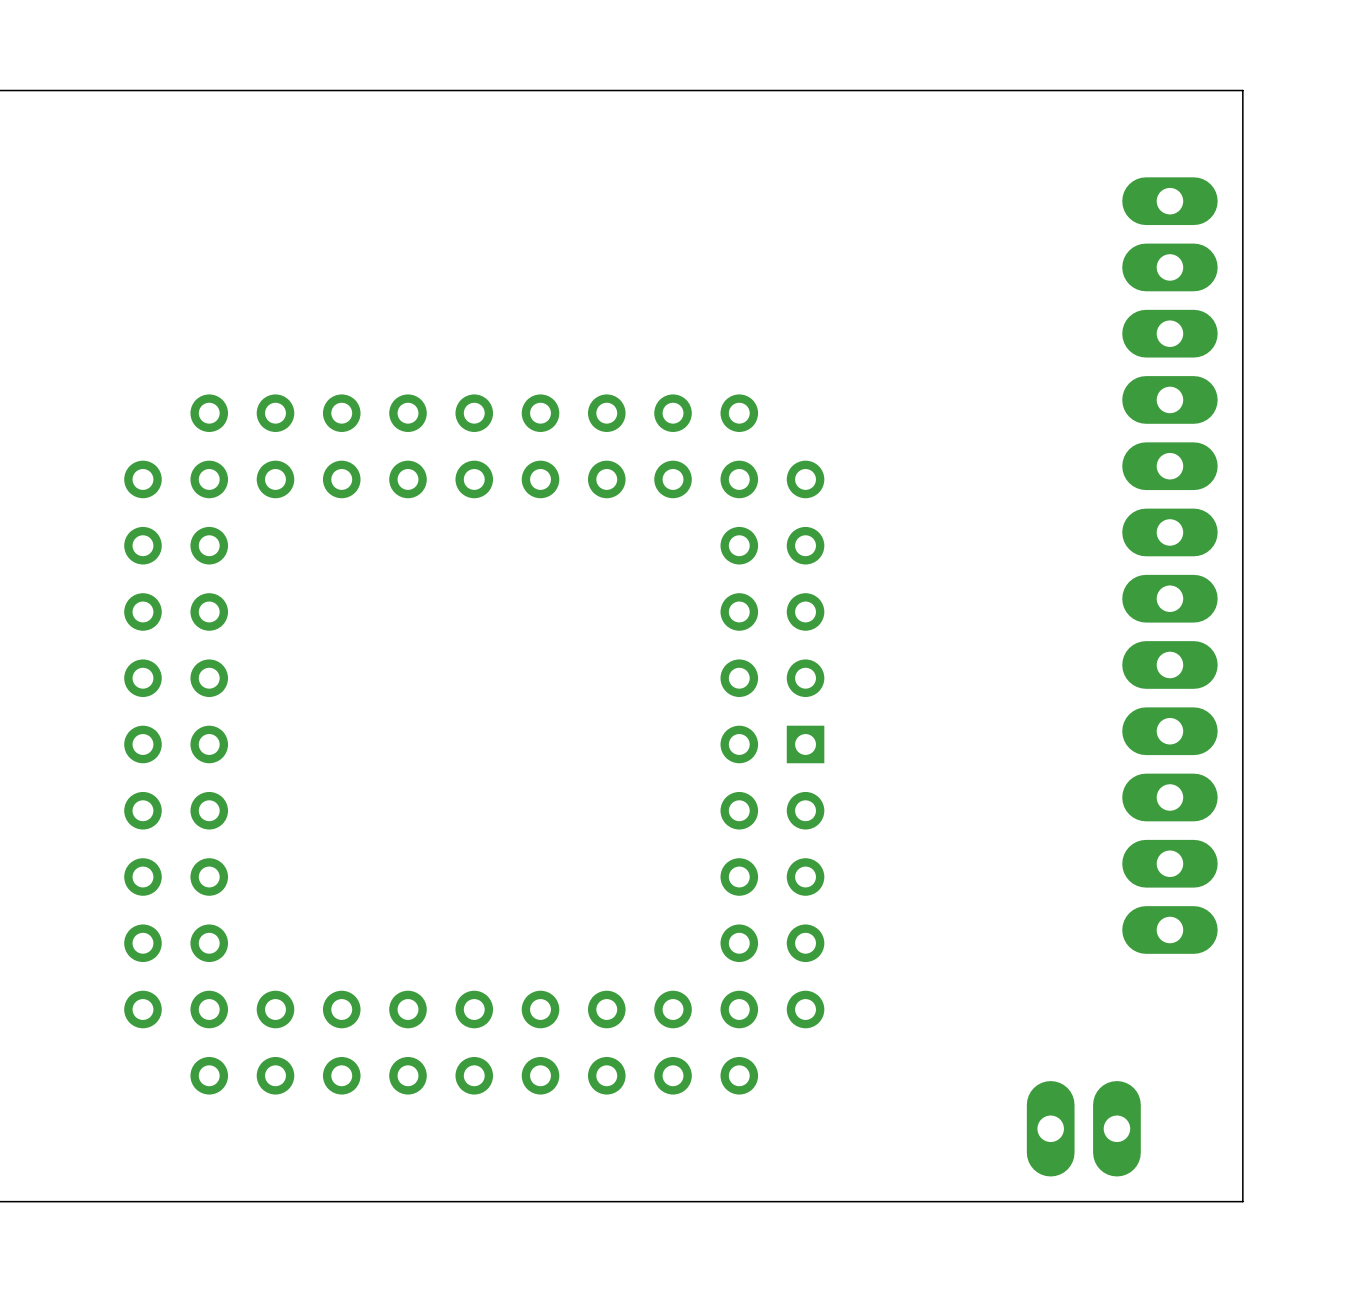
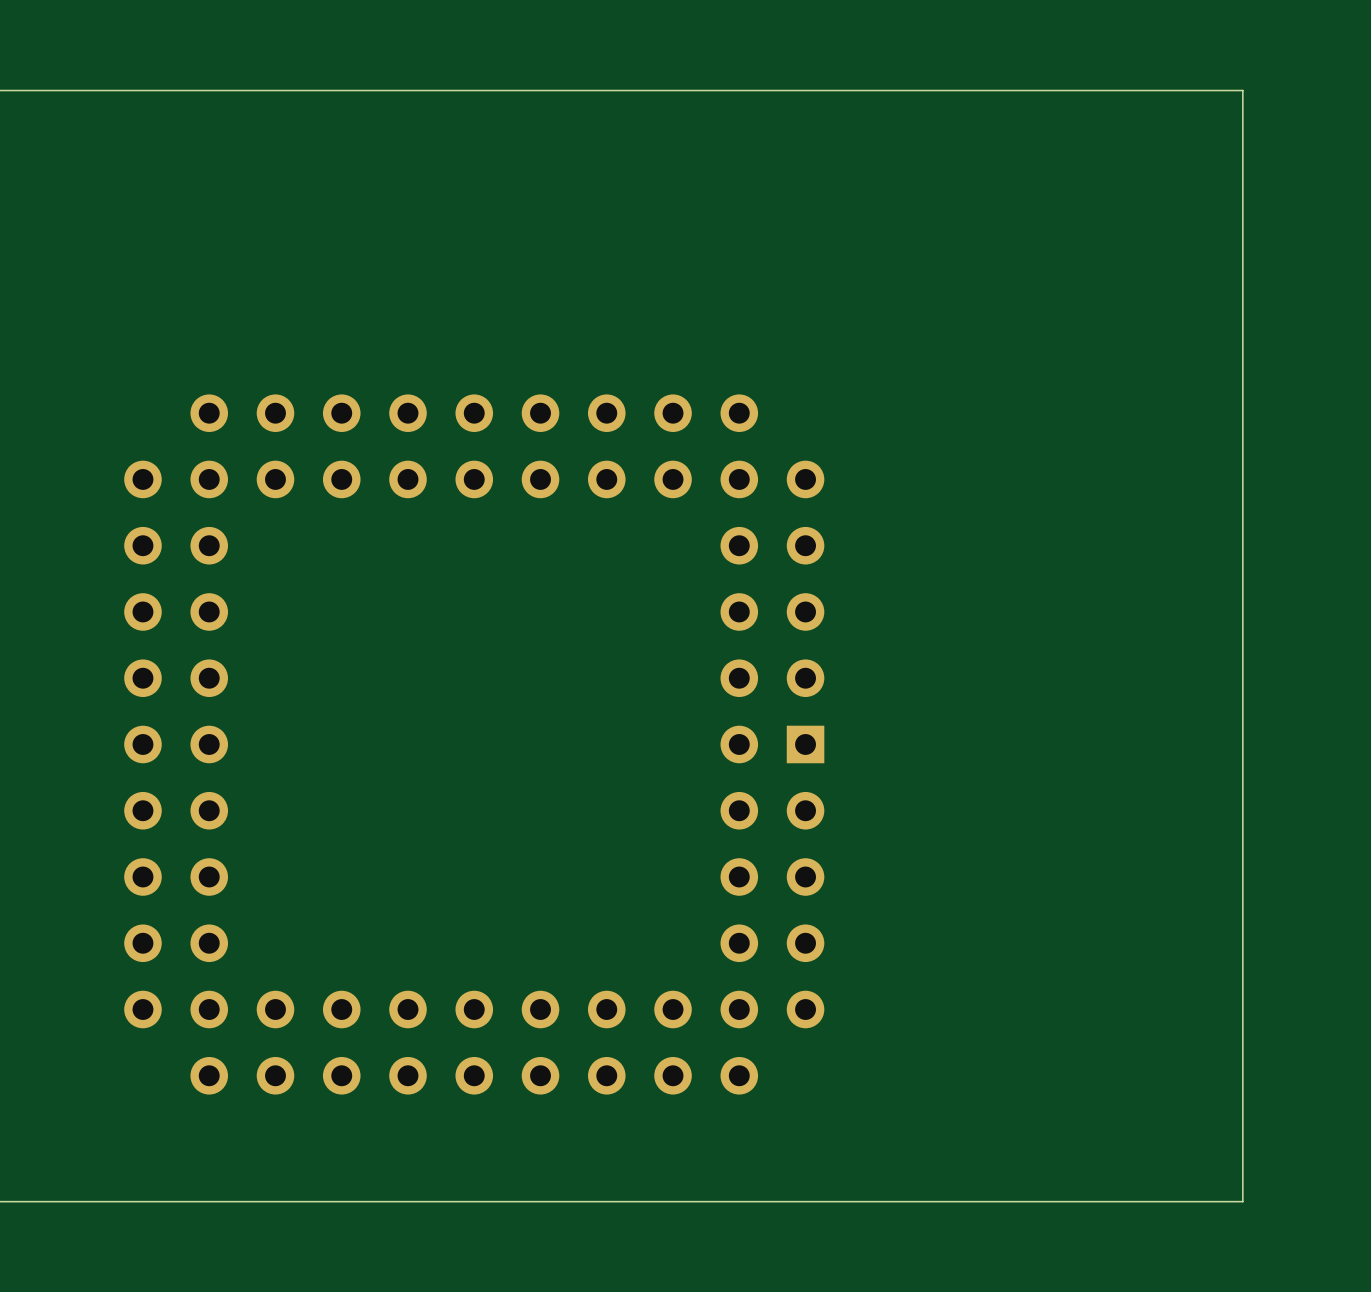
part: (1169, 565) -> none
part: (1083, 1128) -> none

